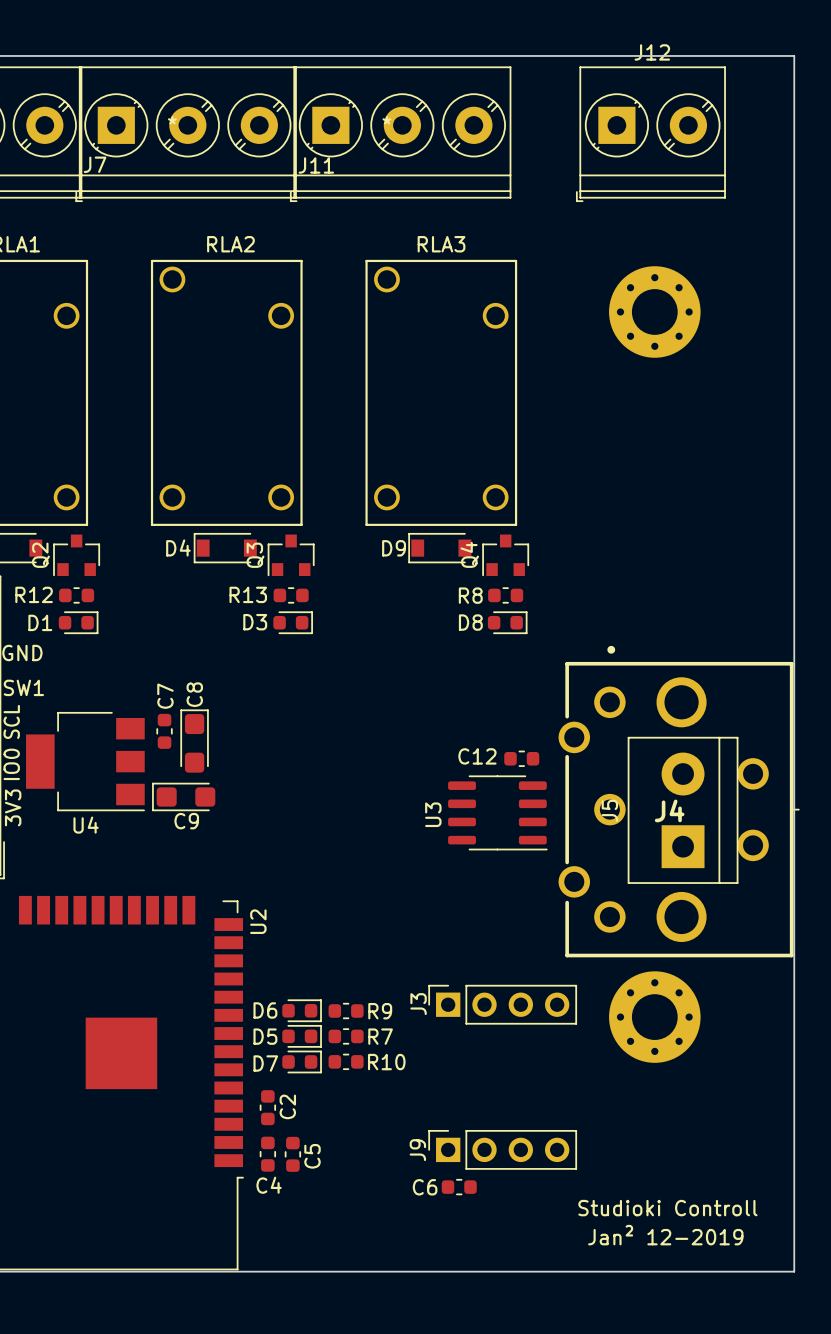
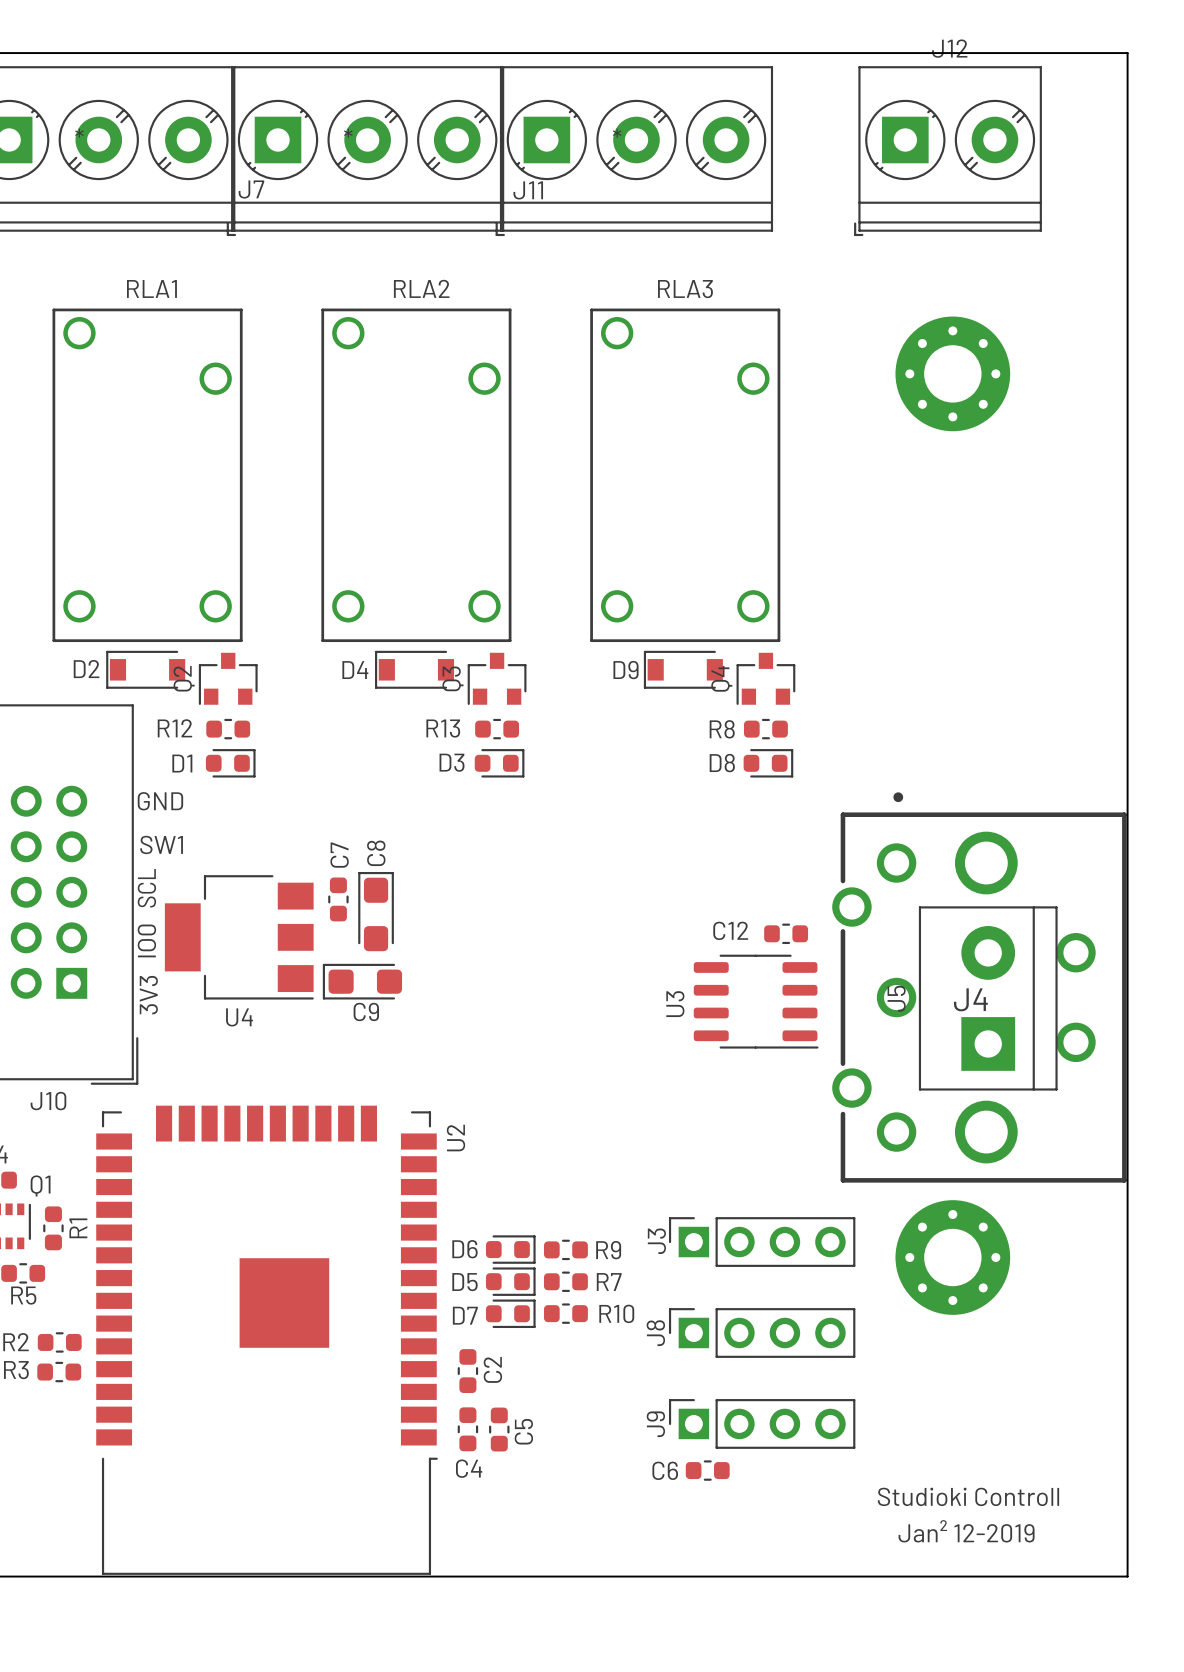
J4 footprint: [558, 645, 800, 958] -> [832, 792, 1127, 1183]
J8: none -> (762, 1332)

